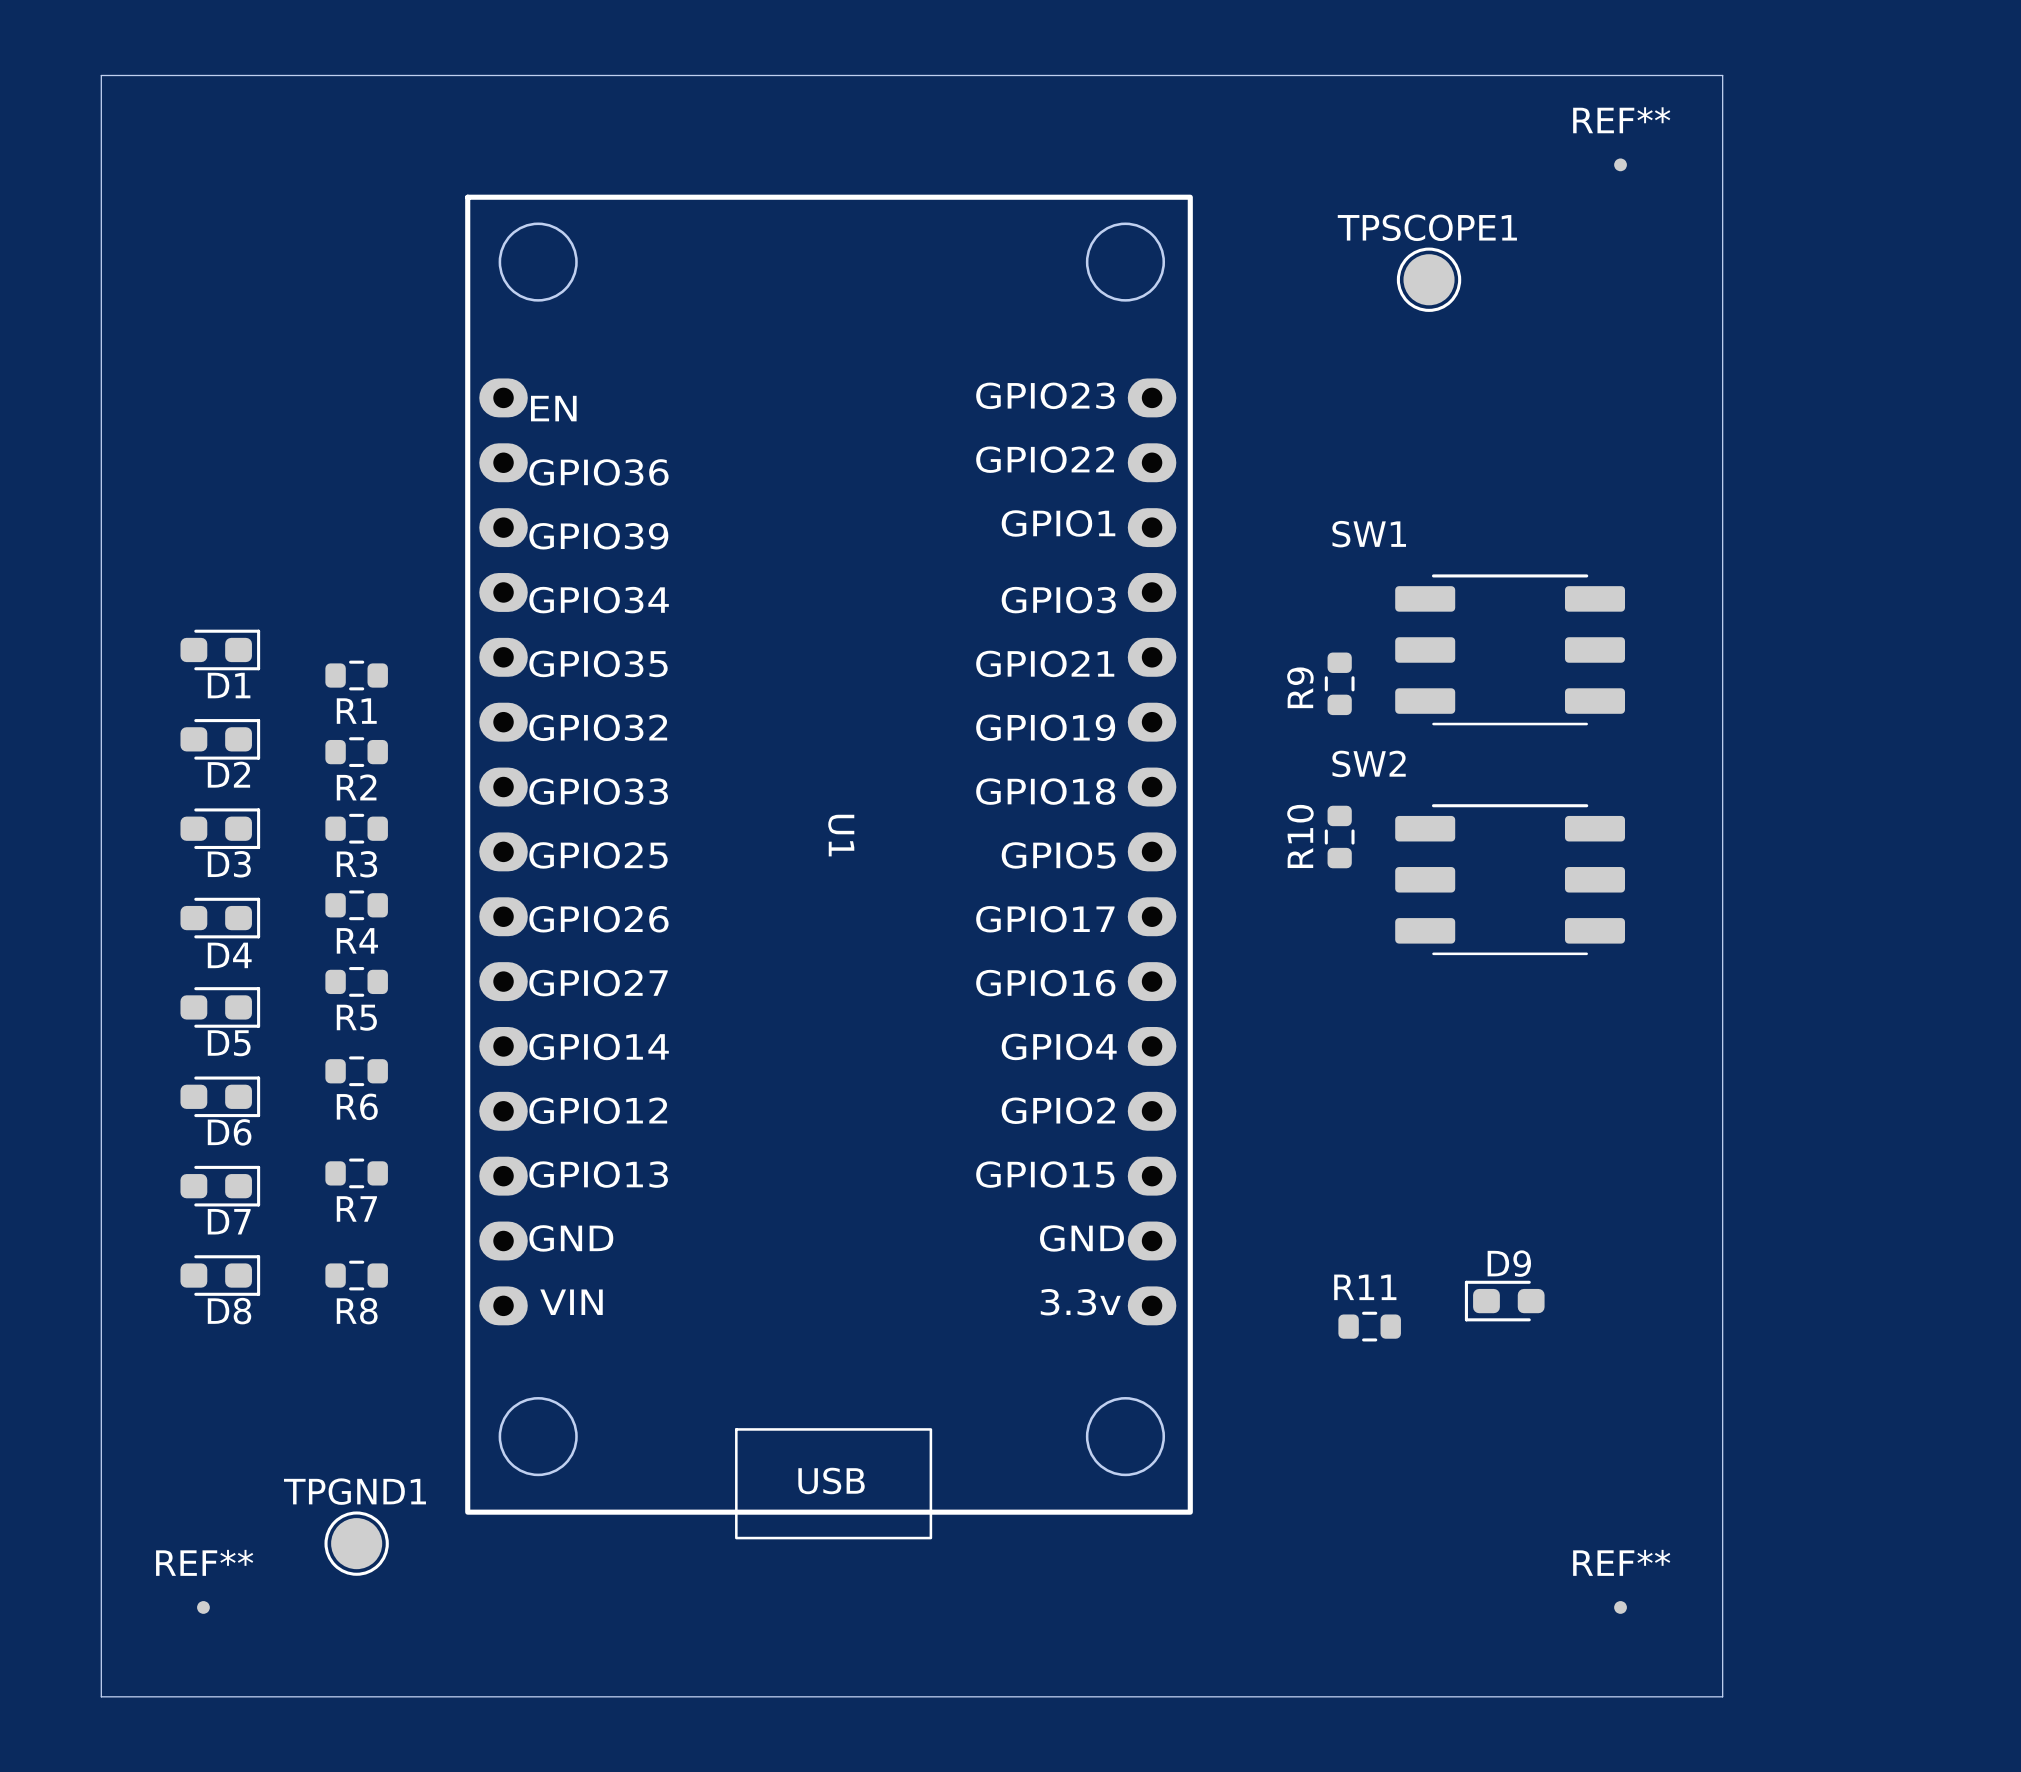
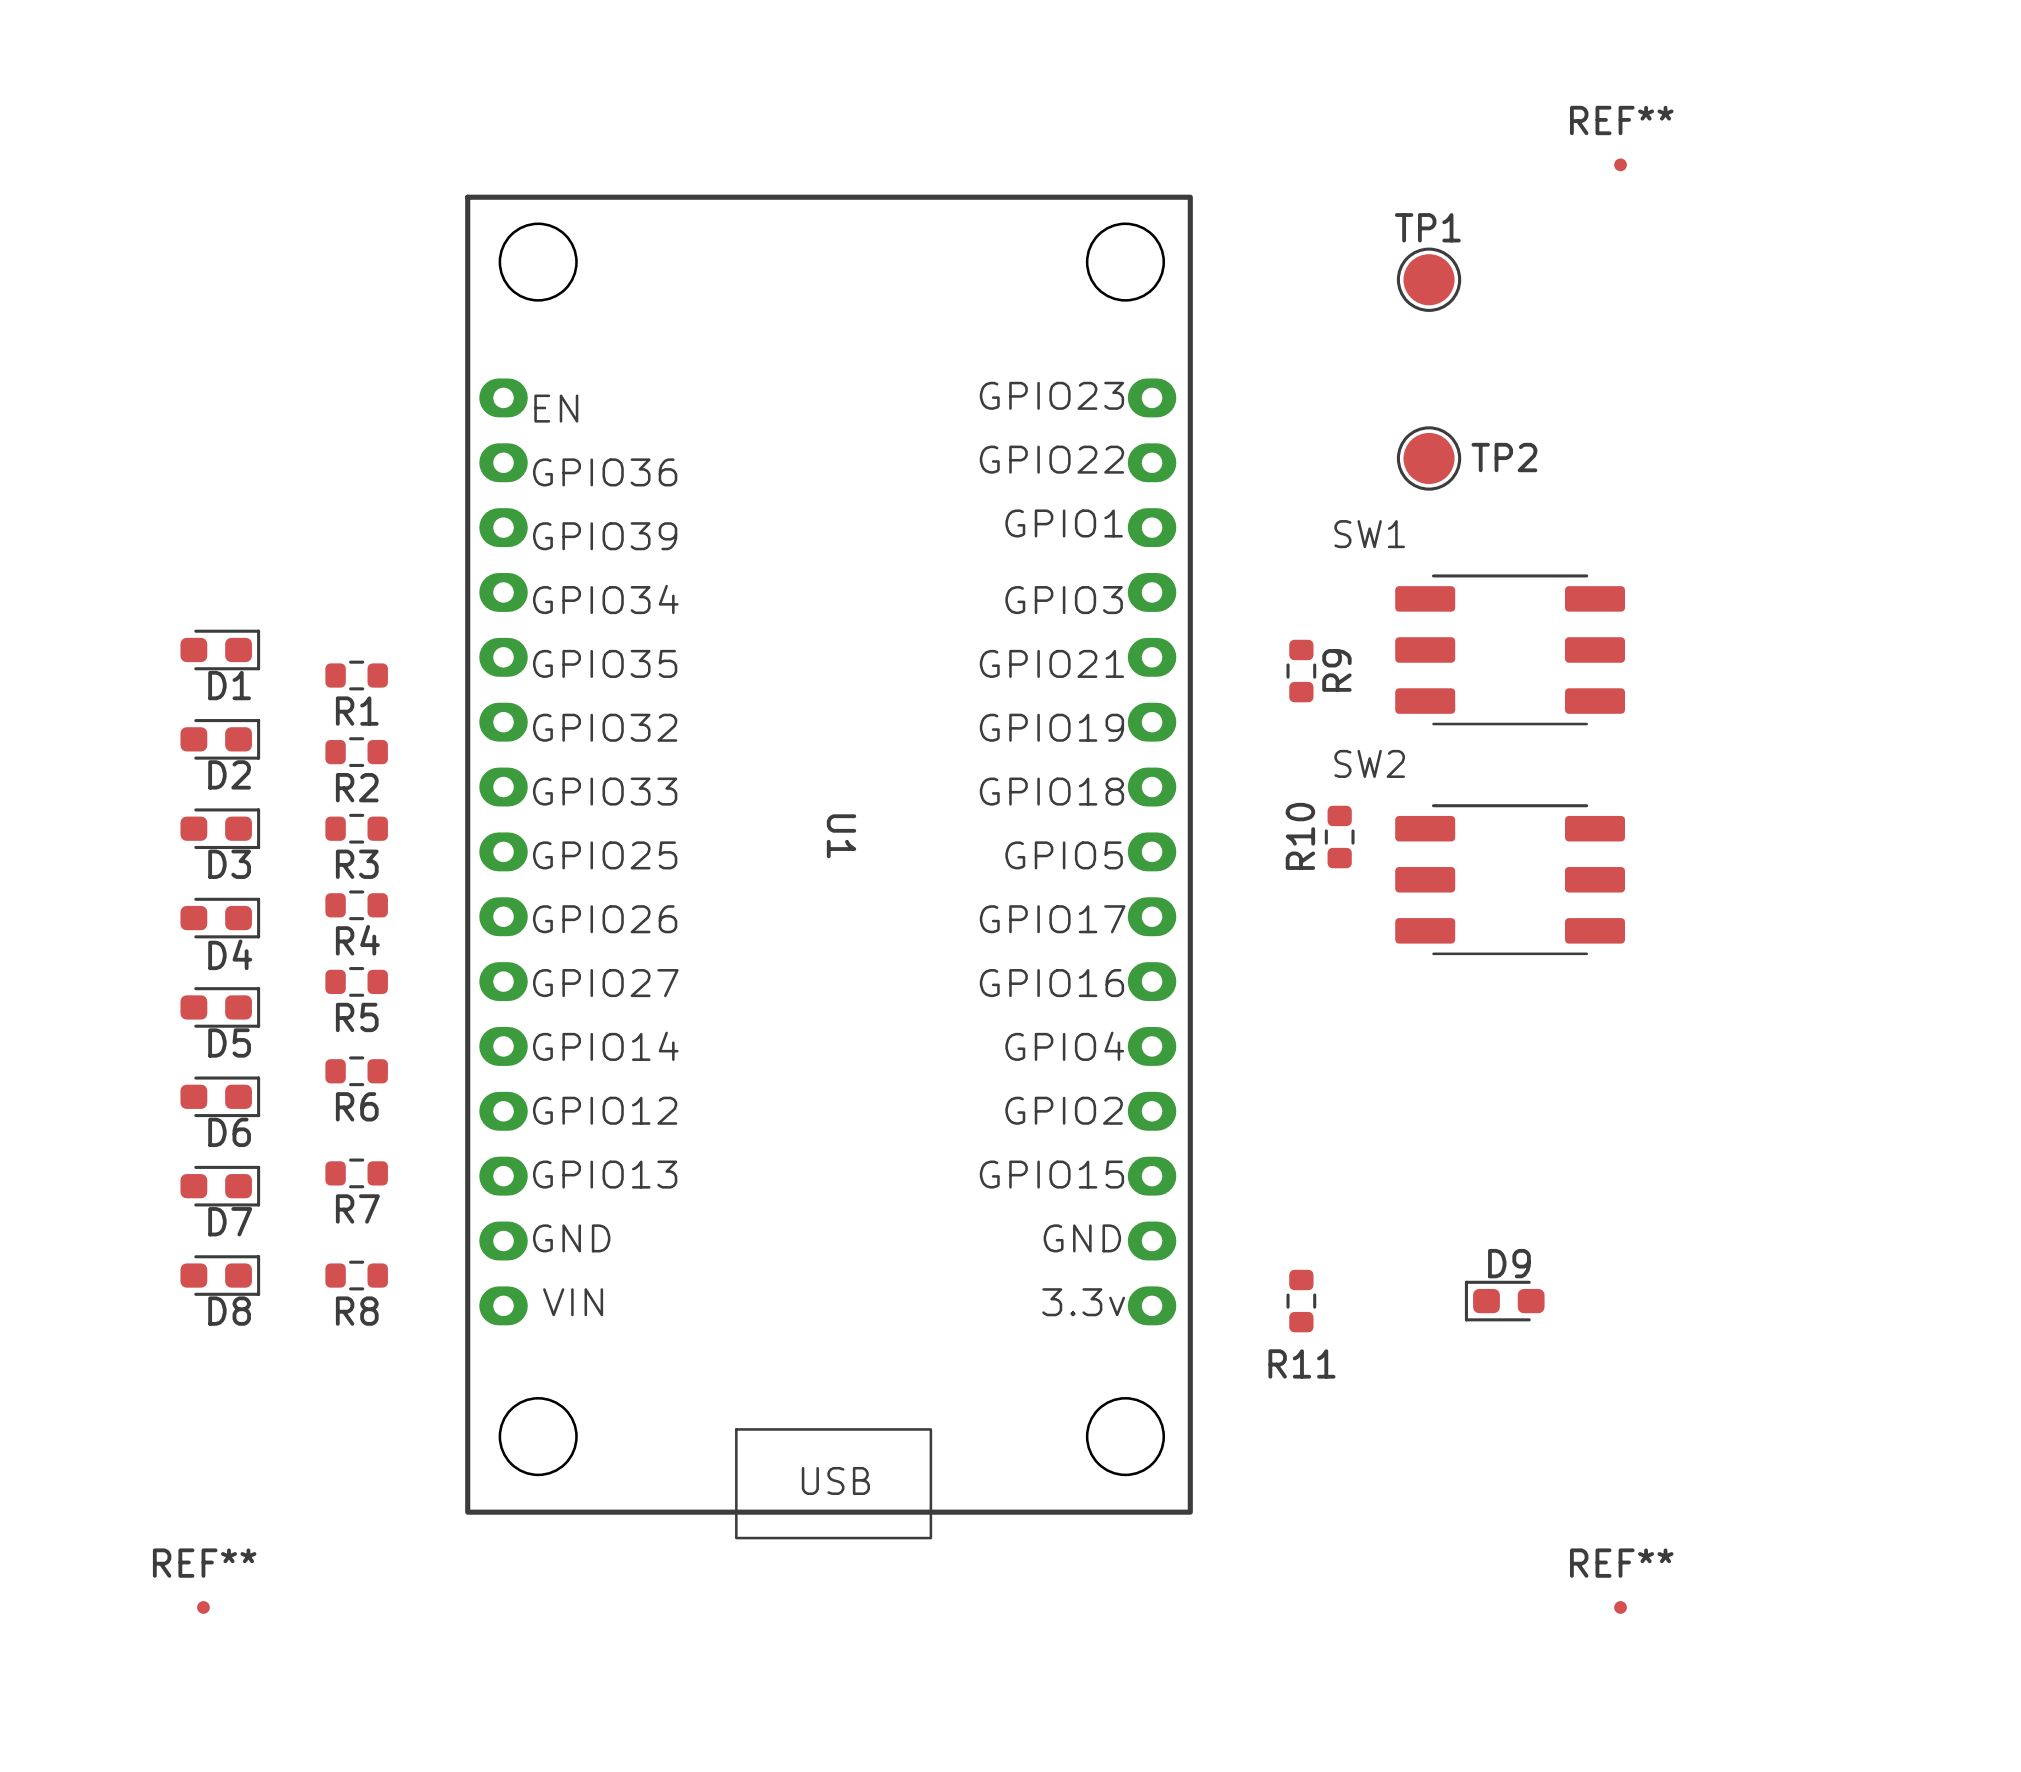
board edge: (101, 75) (1722, 75) (1722, 1696) (101, 1696) (101, 75) -> none
TPSCOPE1 name: TPSCOPE1 (1427, 227) -> TP1 (1427, 227)
TP2: none -> (1429, 458)
R9 position: (1339, 683) -> (1301, 671)
R9 name position: R9 (1300, 687) -> R9 (1336, 670)
R11 name position: R11 (1365, 1287) -> R11 (1301, 1363)
R11 rotation: 0° (1369, 1326) -> 90° clockwise (1301, 1301)
R11 position: (1369, 1326) -> (1301, 1301)
TPGND1: (356, 1543) -> none

